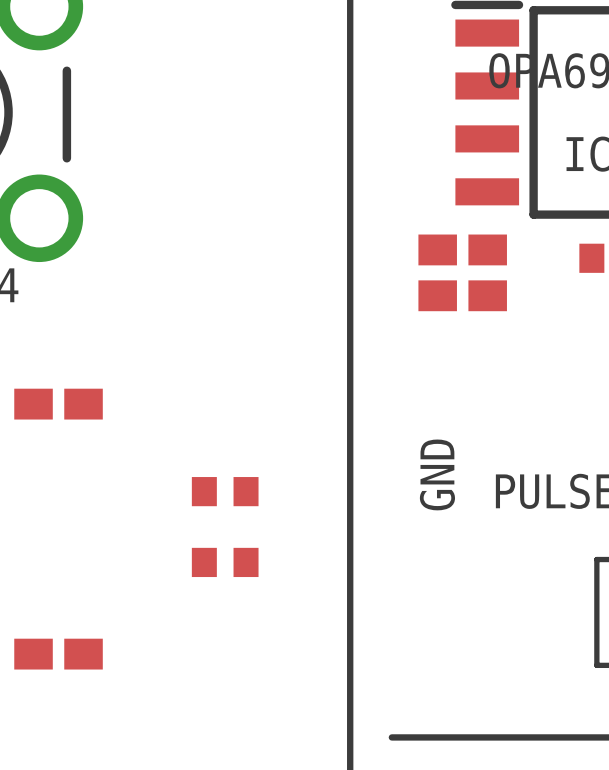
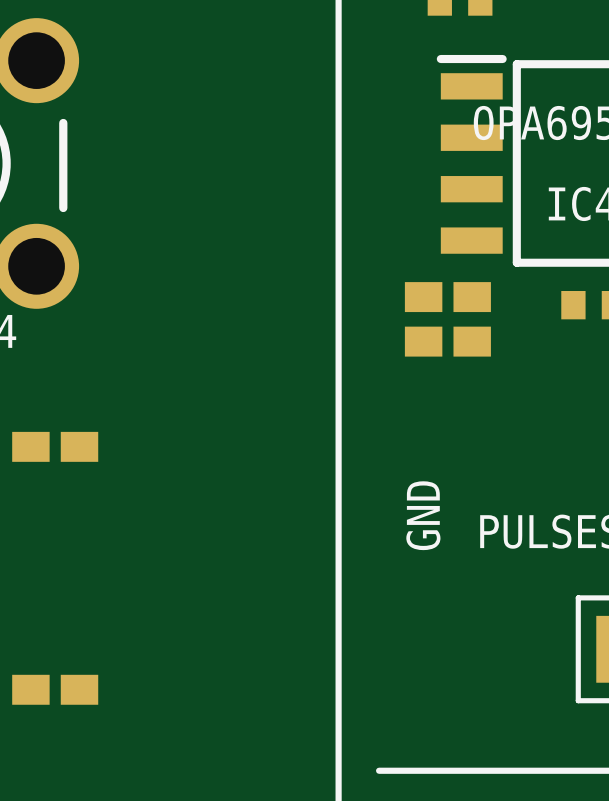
part: (225, 491) -> none
part: (225, 562) -> none

